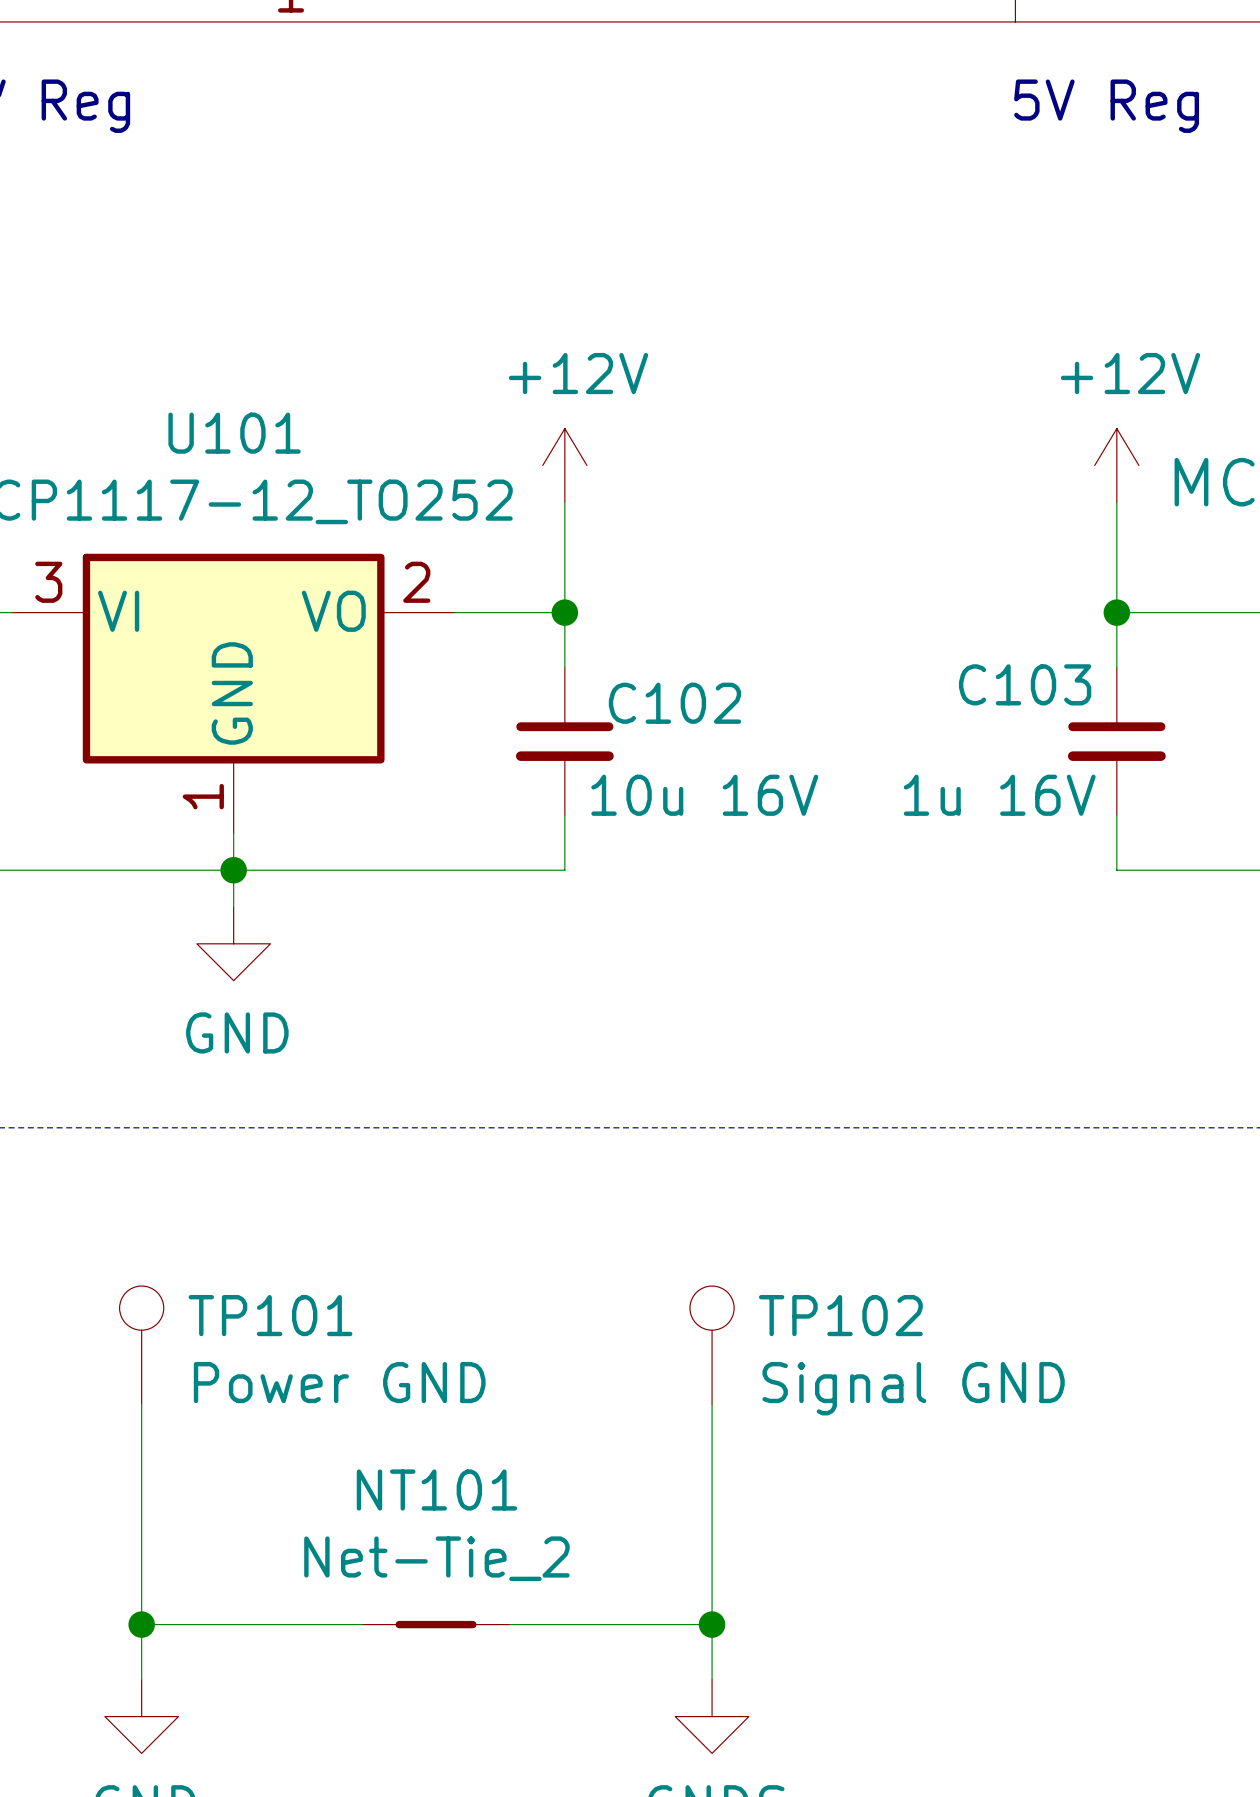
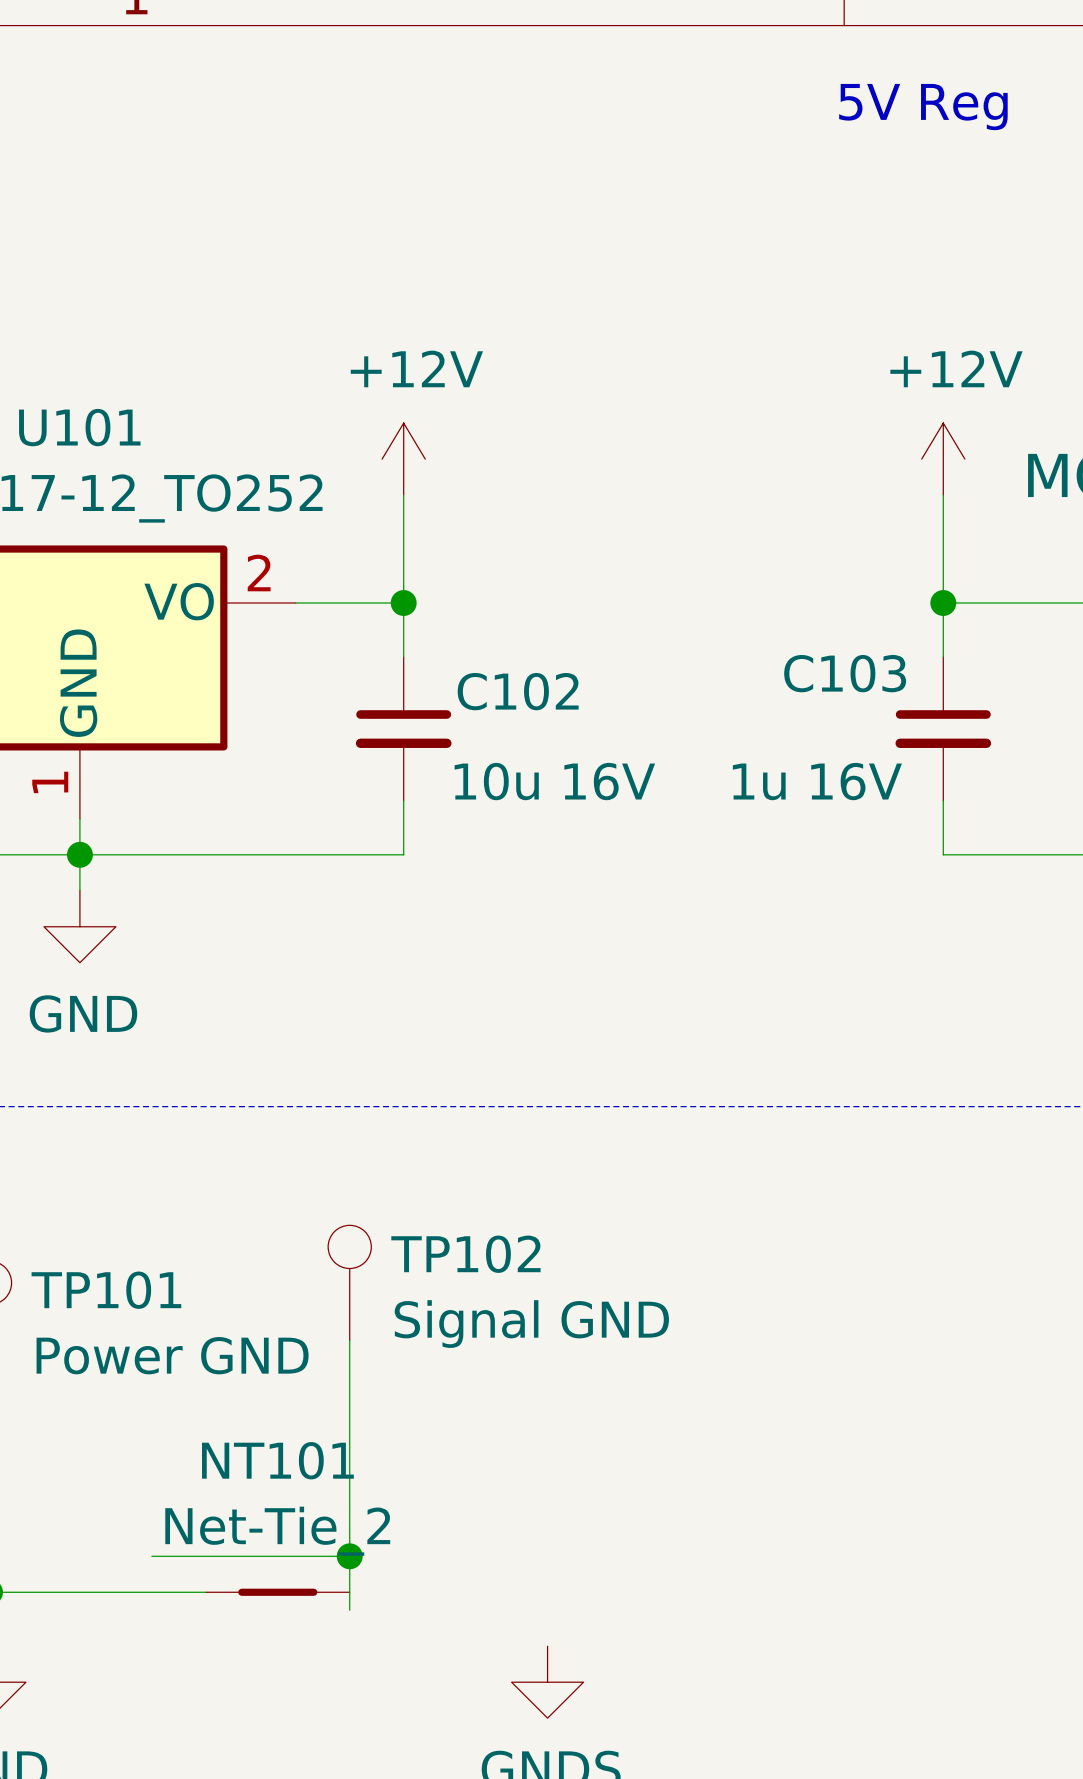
TP102 position: (712, 1344) -> (349, 1282)
wire: (712, 1403) (712, 1679) -> (349, 1340) (349, 1610)
junction: none -> (349, 1556)
wire: (509, 1624) (712, 1624) -> (151, 1556) (349, 1556)
junction: (712, 1624) -> none

